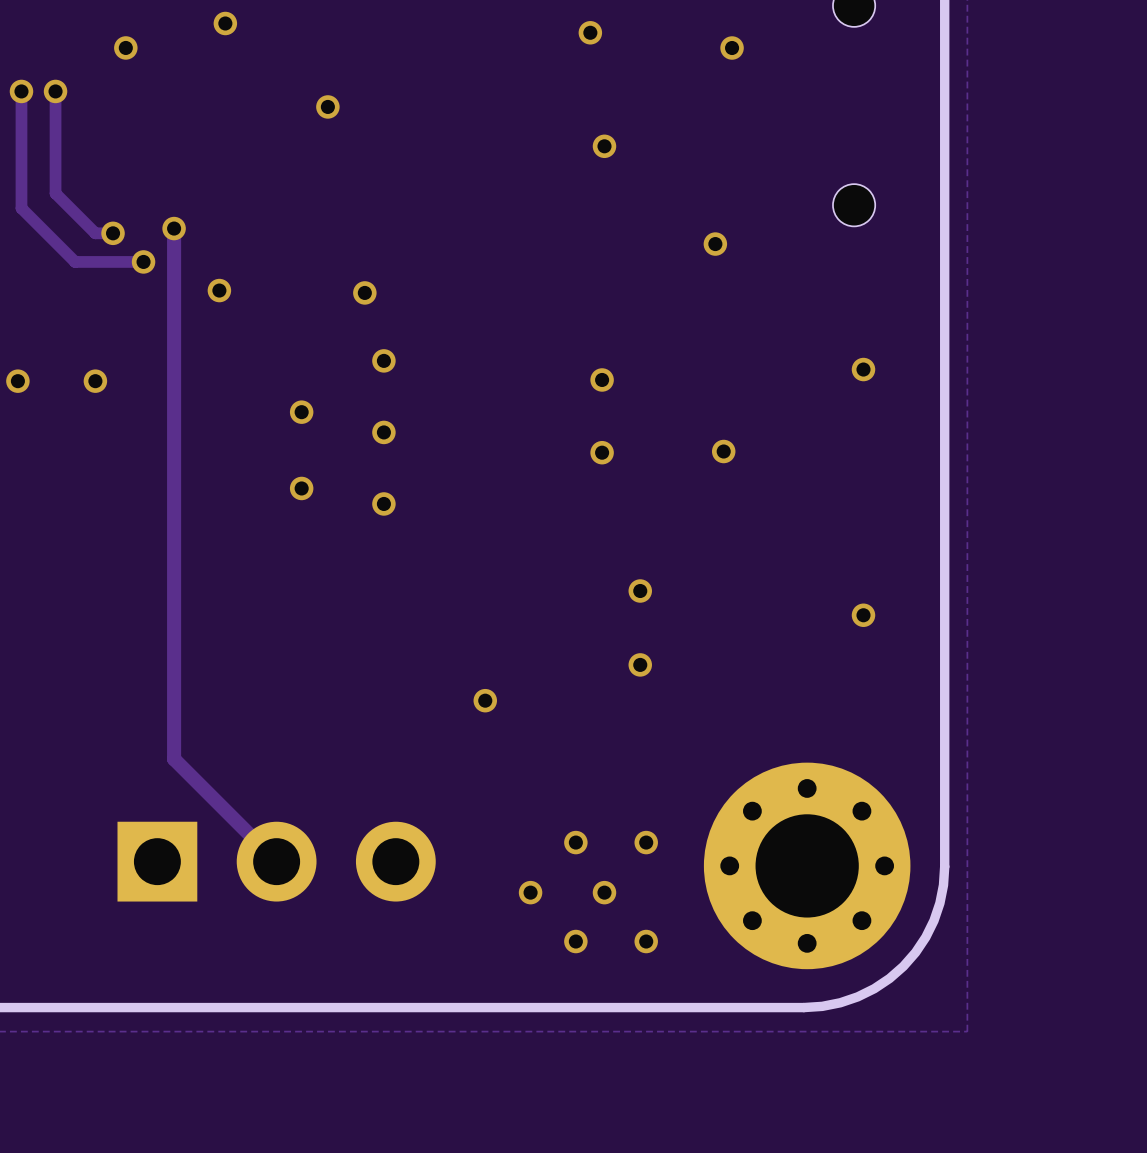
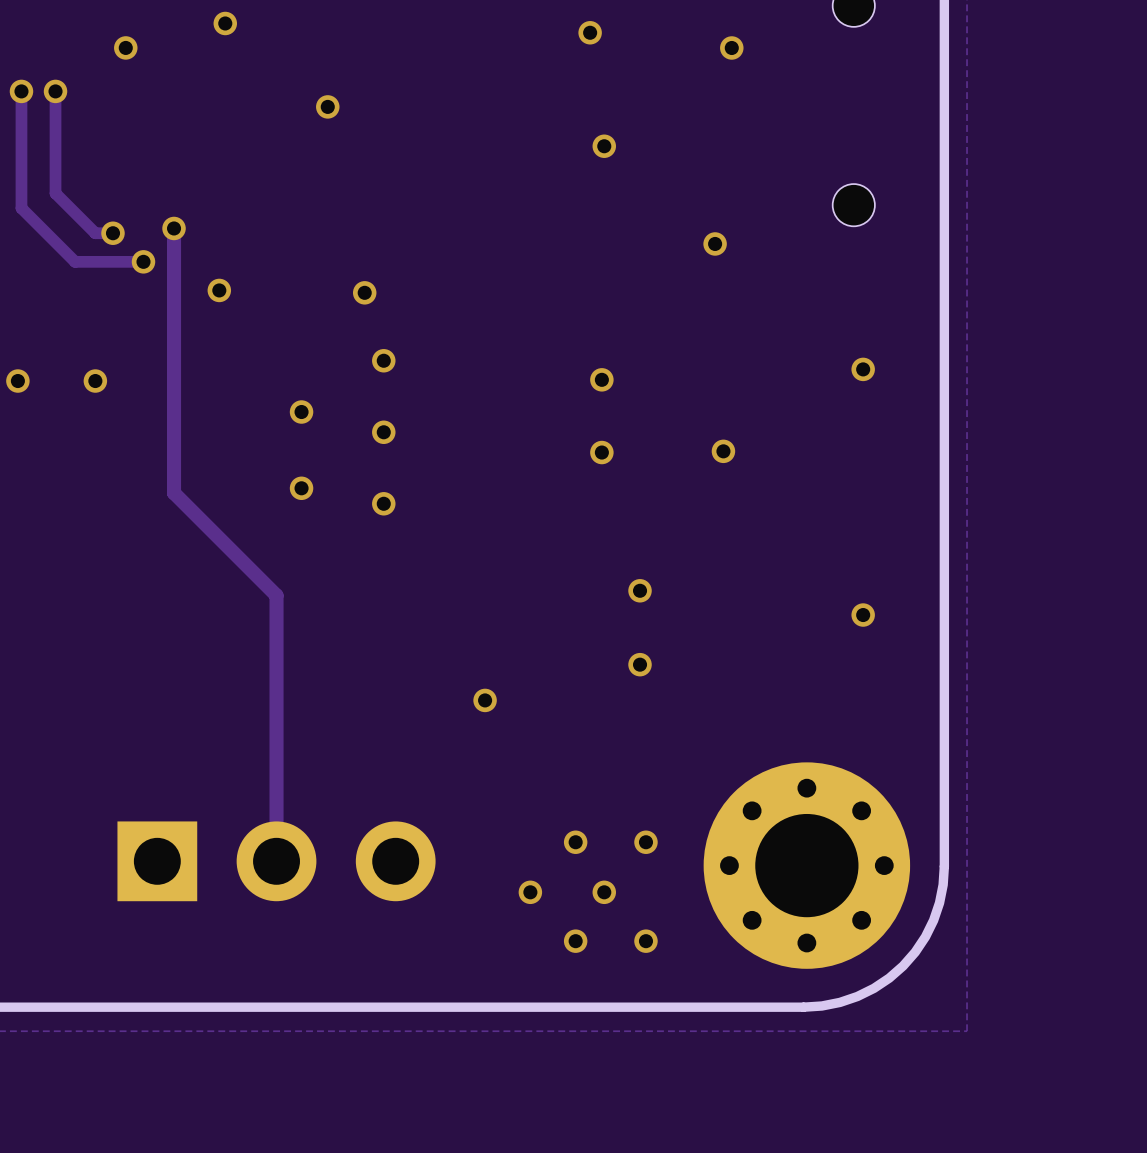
track: (174, 493) (174, 759) (276, 861) -> (174, 493) (276, 595) (276, 861)

